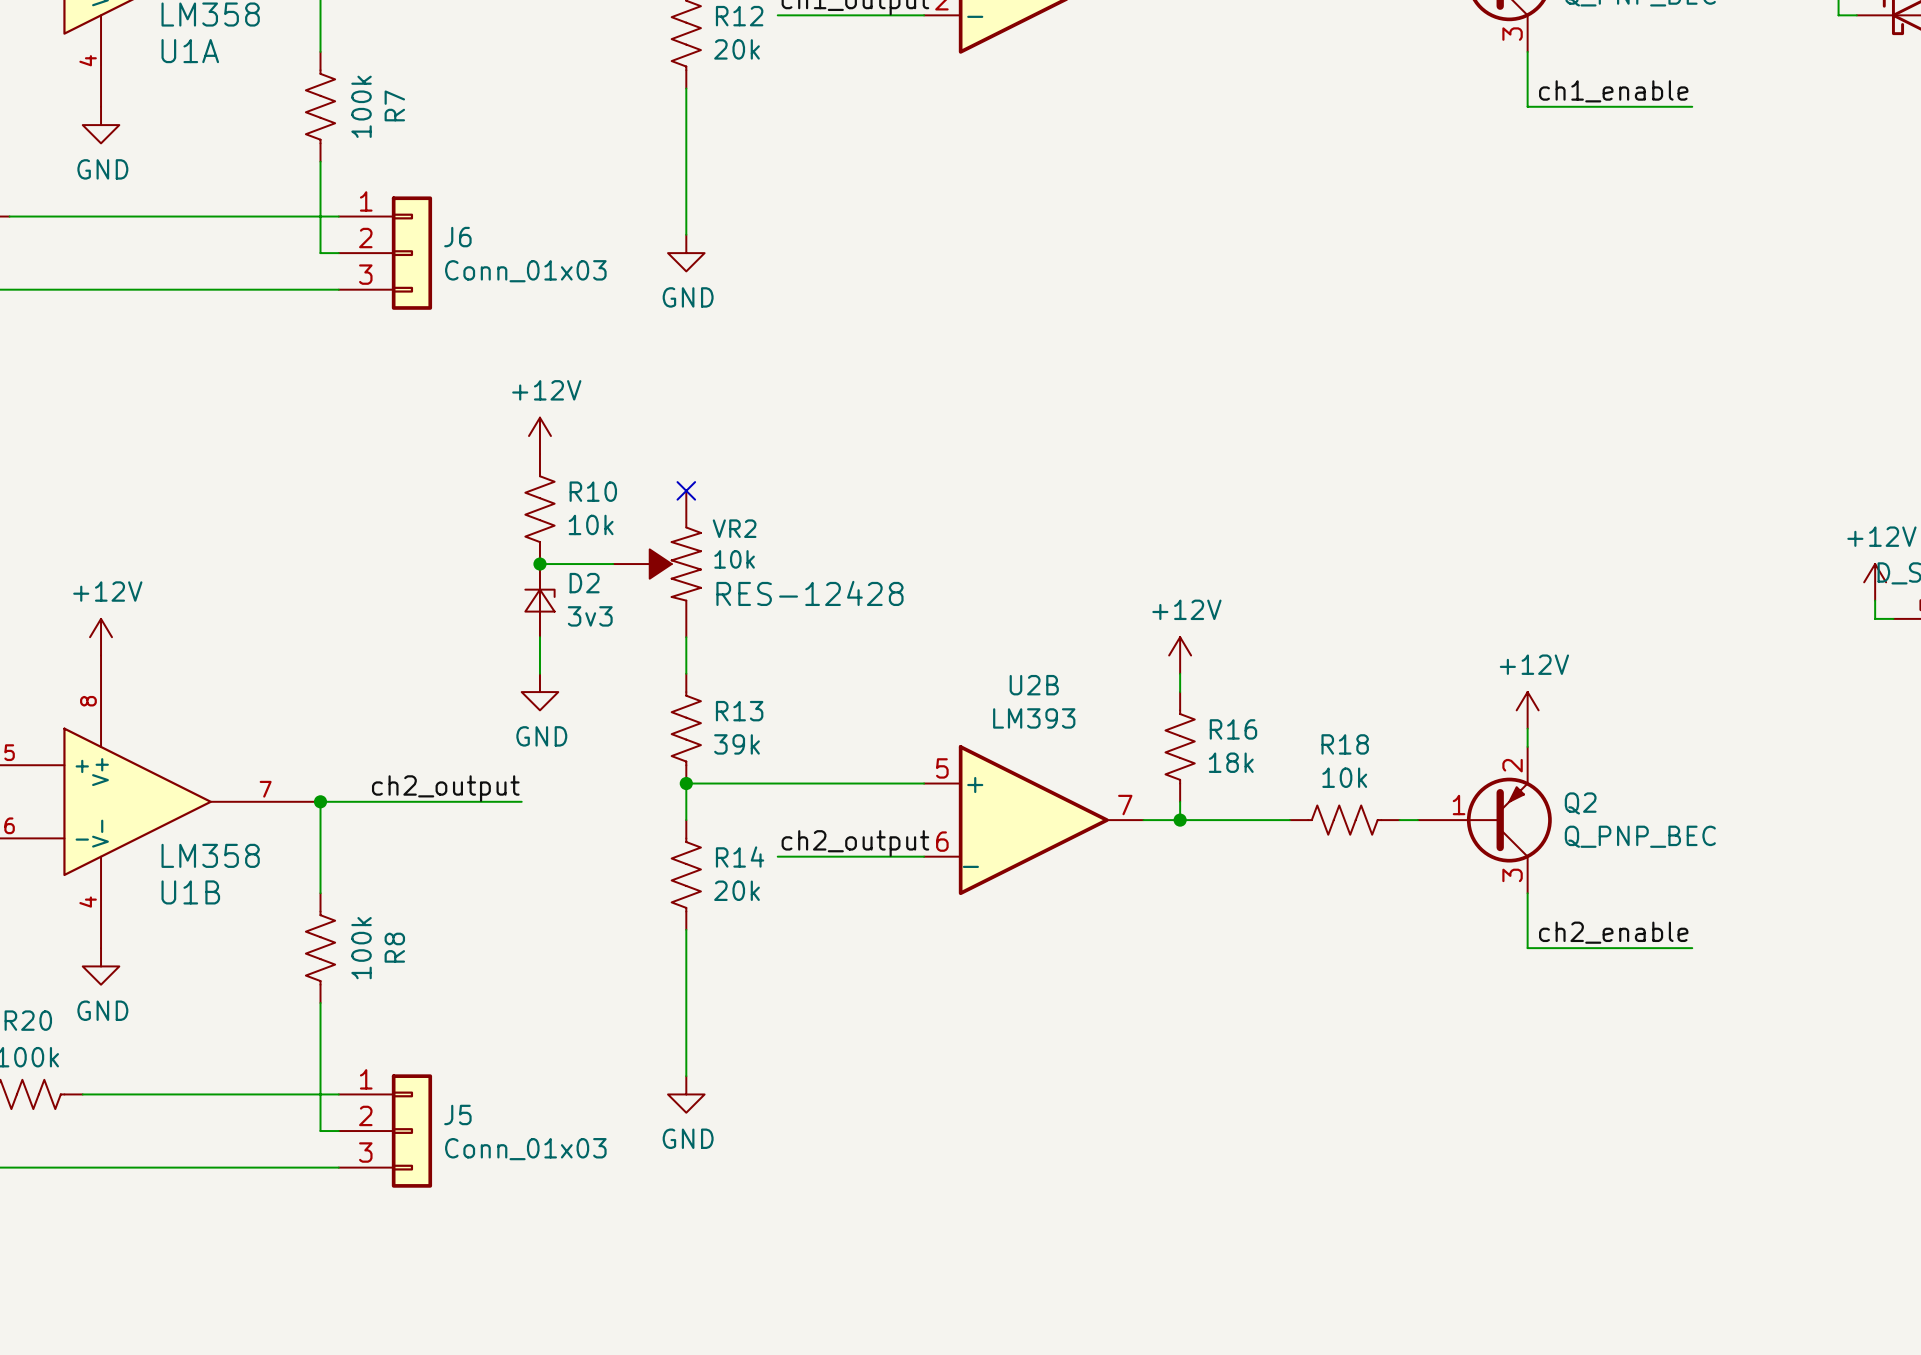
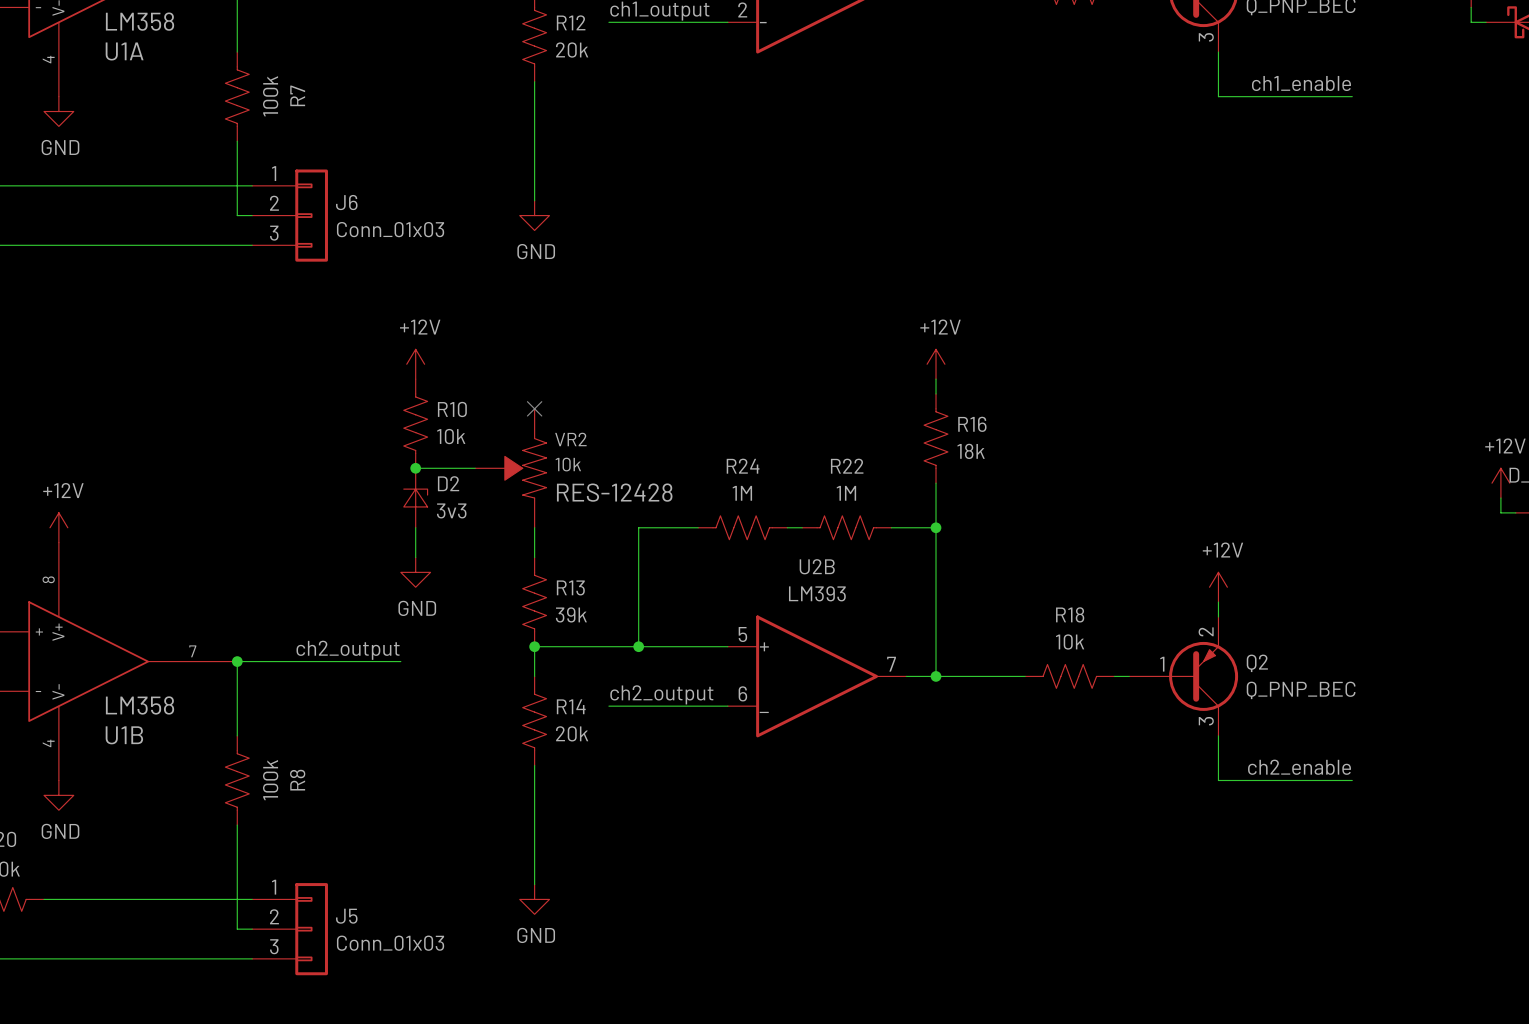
wire: none -> (936, 379) (936, 393)
wire: none -> (936, 483) (936, 557)
wire: none -> (698, 527) (638, 527) (638, 646)
R24: none -> 1M (742, 527)
wire: none -> (787, 527) (802, 527)
R22: none -> 1M (846, 527)
wire: none -> (891, 527) (936, 527)
junction: none -> (936, 527)
power symbol position: +12V (1180, 655) -> +12V (936, 364)
wire: none -> (936, 572) (936, 661)
R16 position: (1180, 746) -> (936, 438)
junction: none -> (638, 646)

